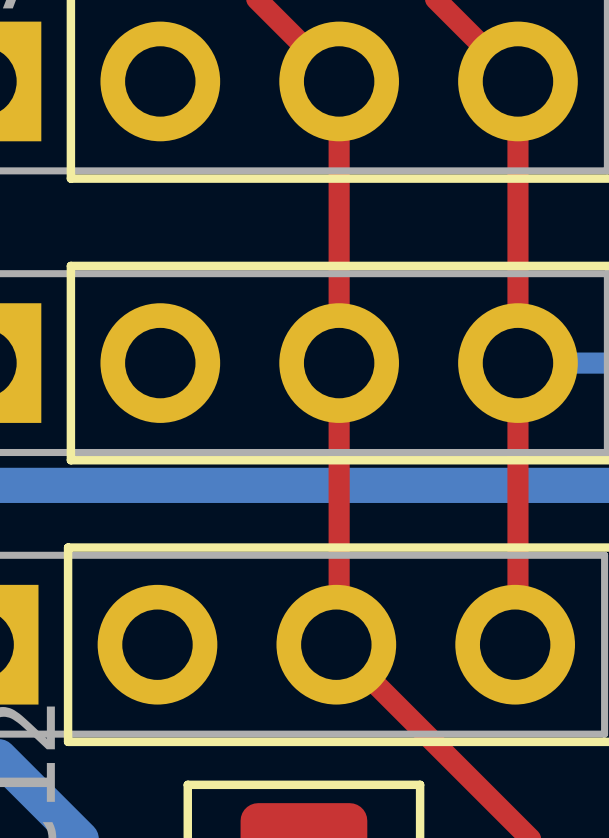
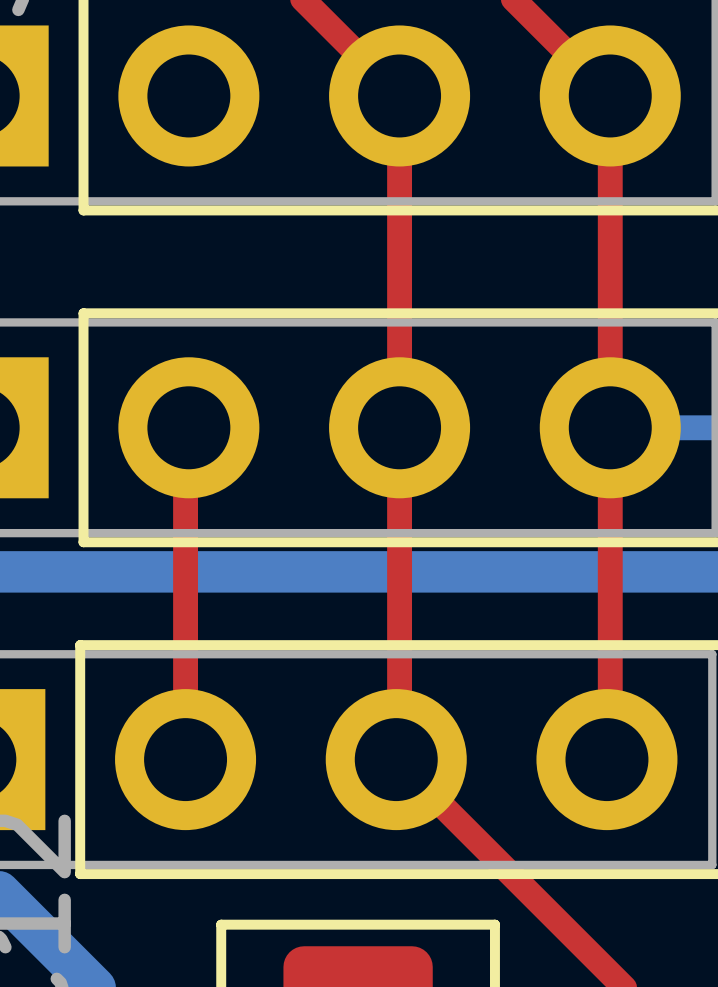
top track: none -> (188, 427) (185, 431) (185, 759)

